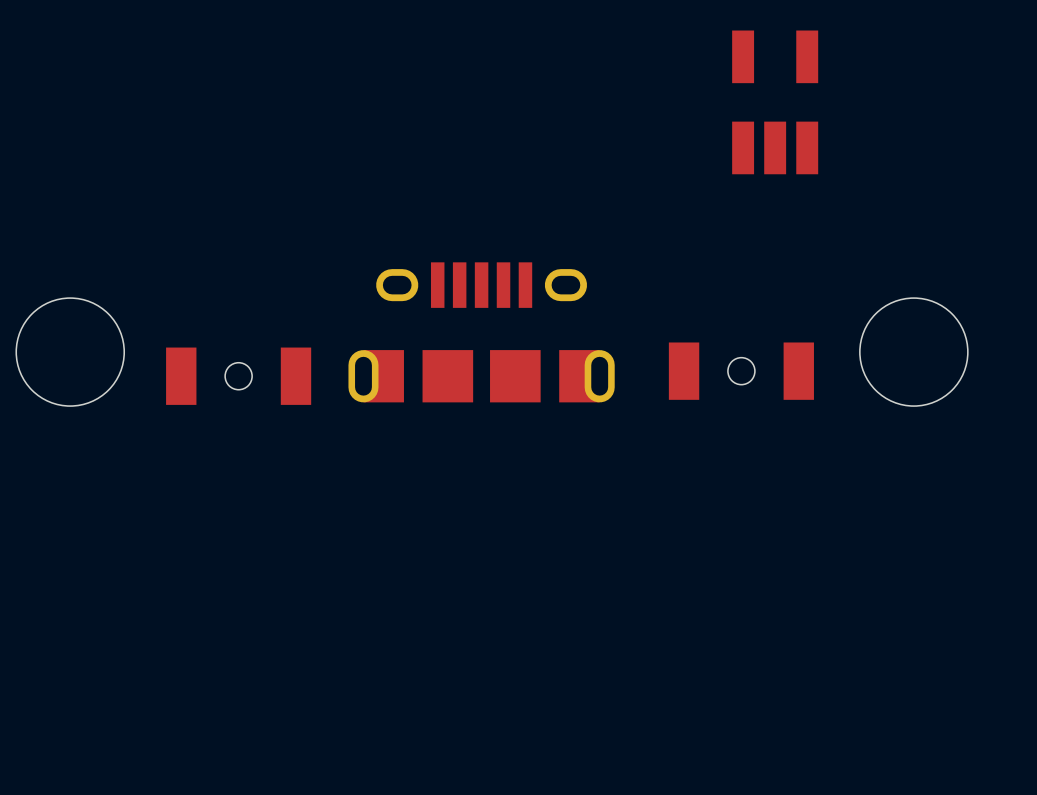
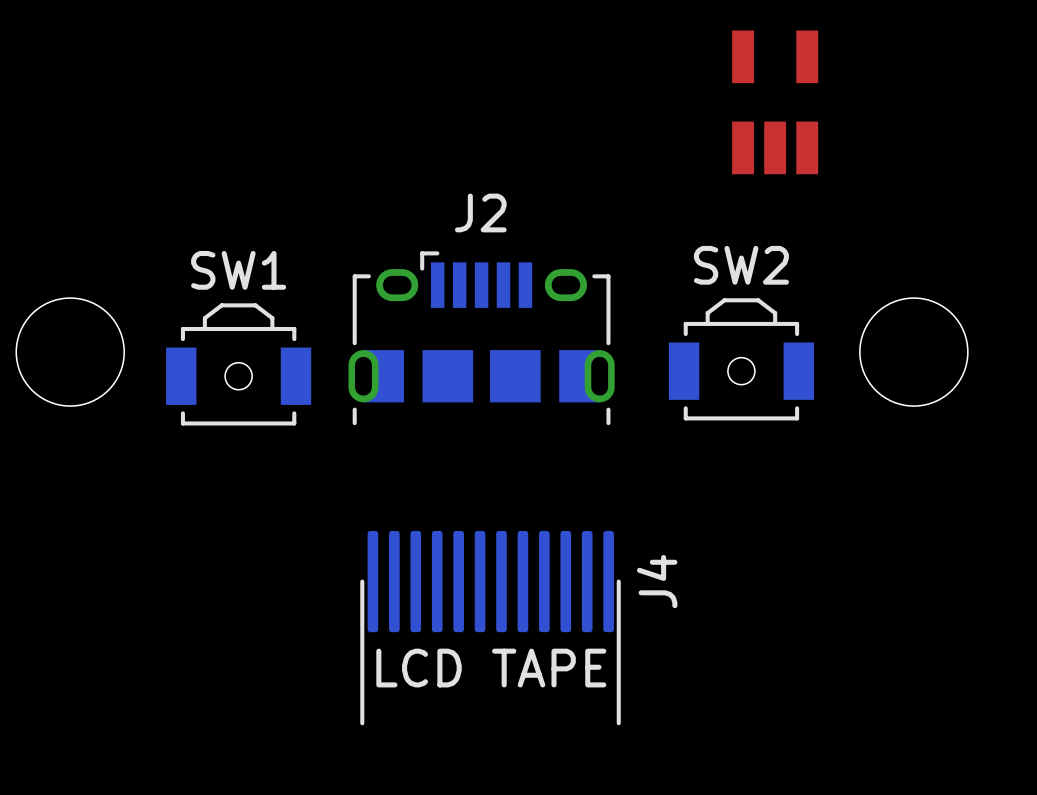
J2 side: top (481, 332) -> bottom (481, 338)
SW2 side: top (741, 371) -> bottom (741, 359)
SW1 side: top (238, 376) -> bottom (238, 364)
J4: none -> (490, 628)

